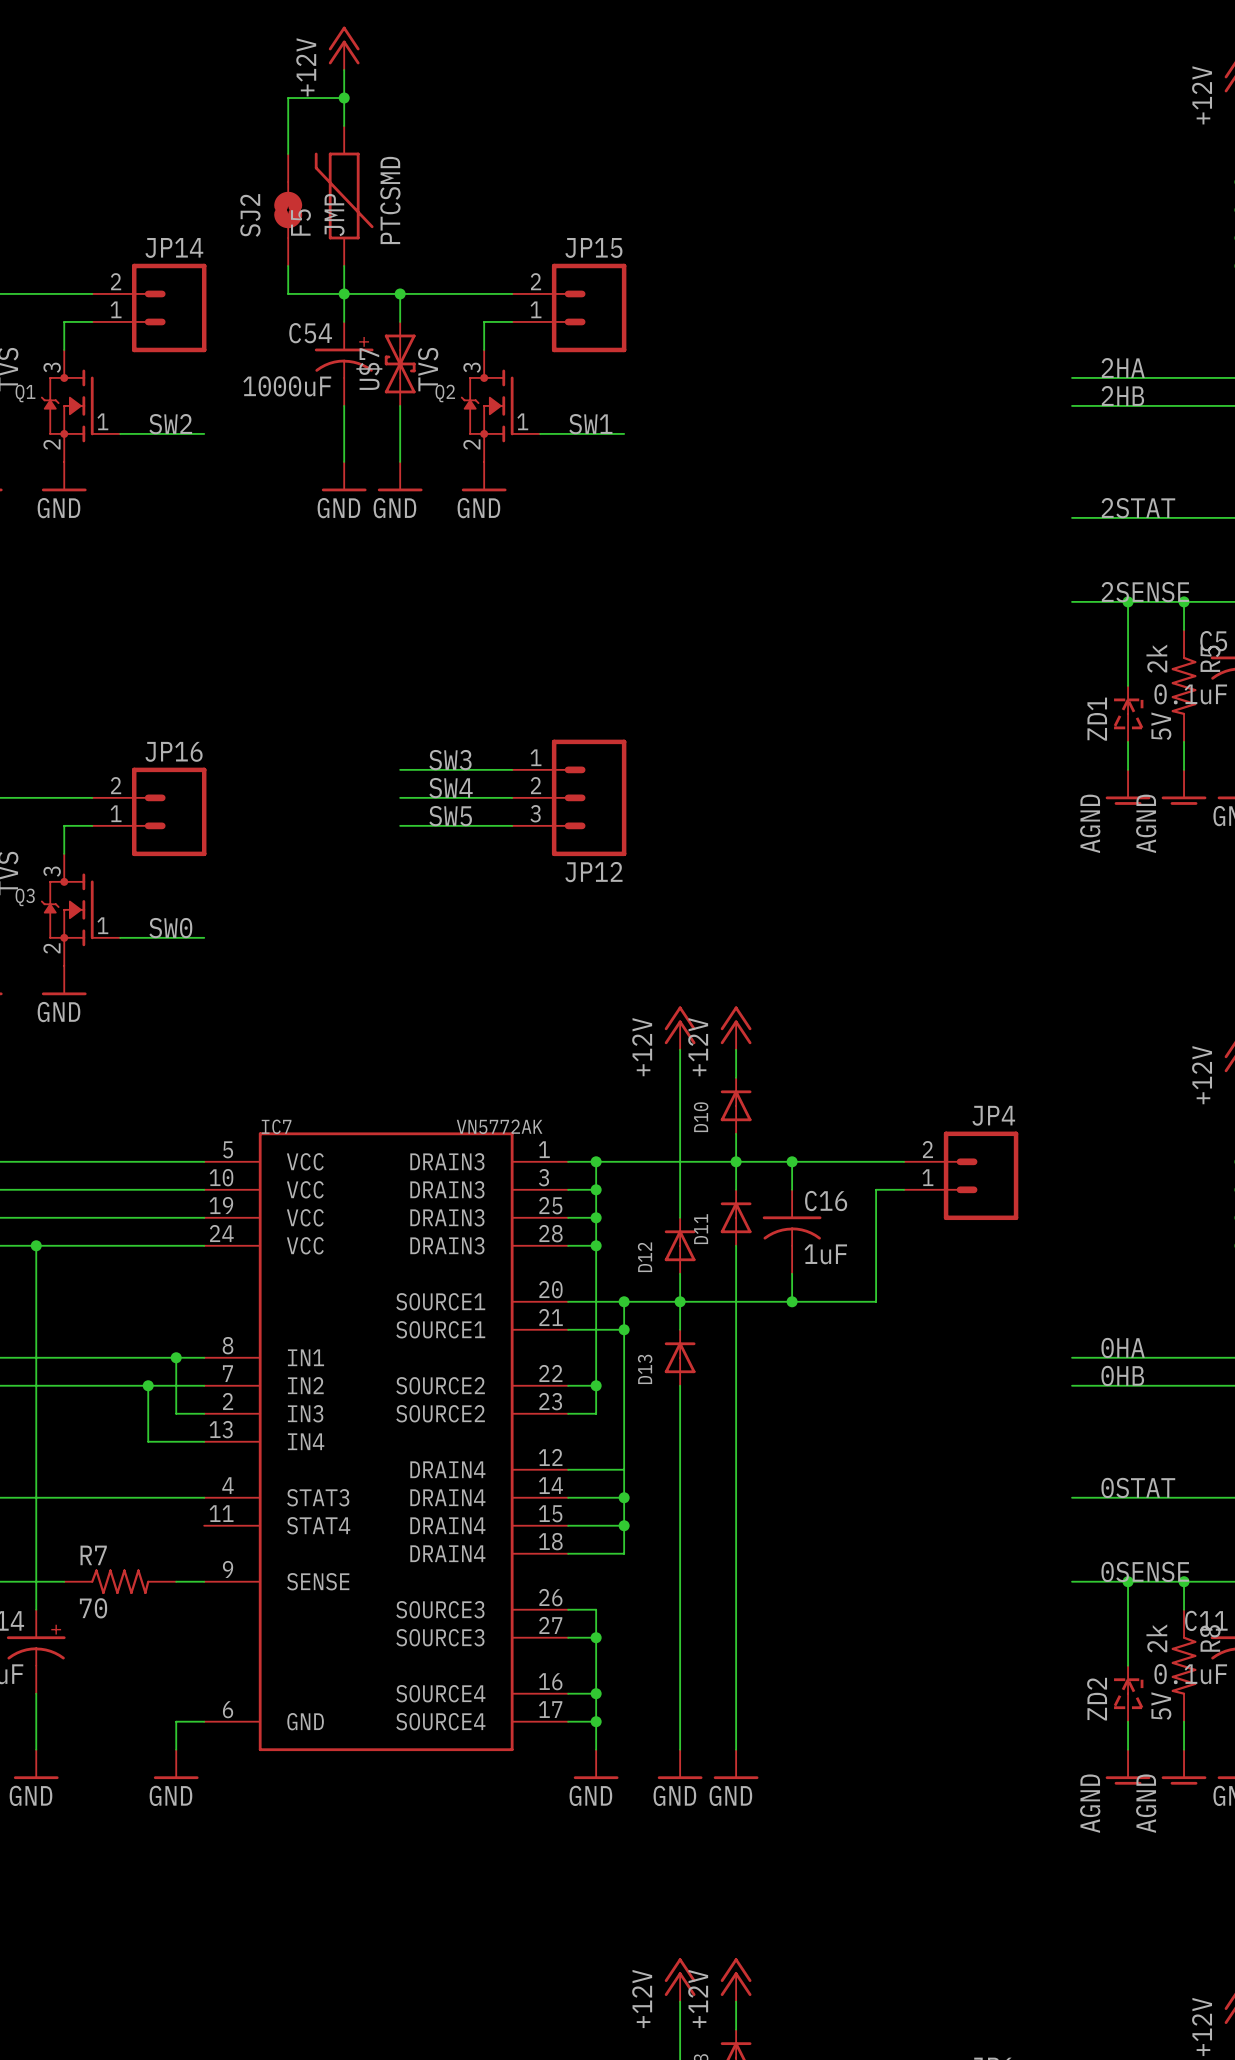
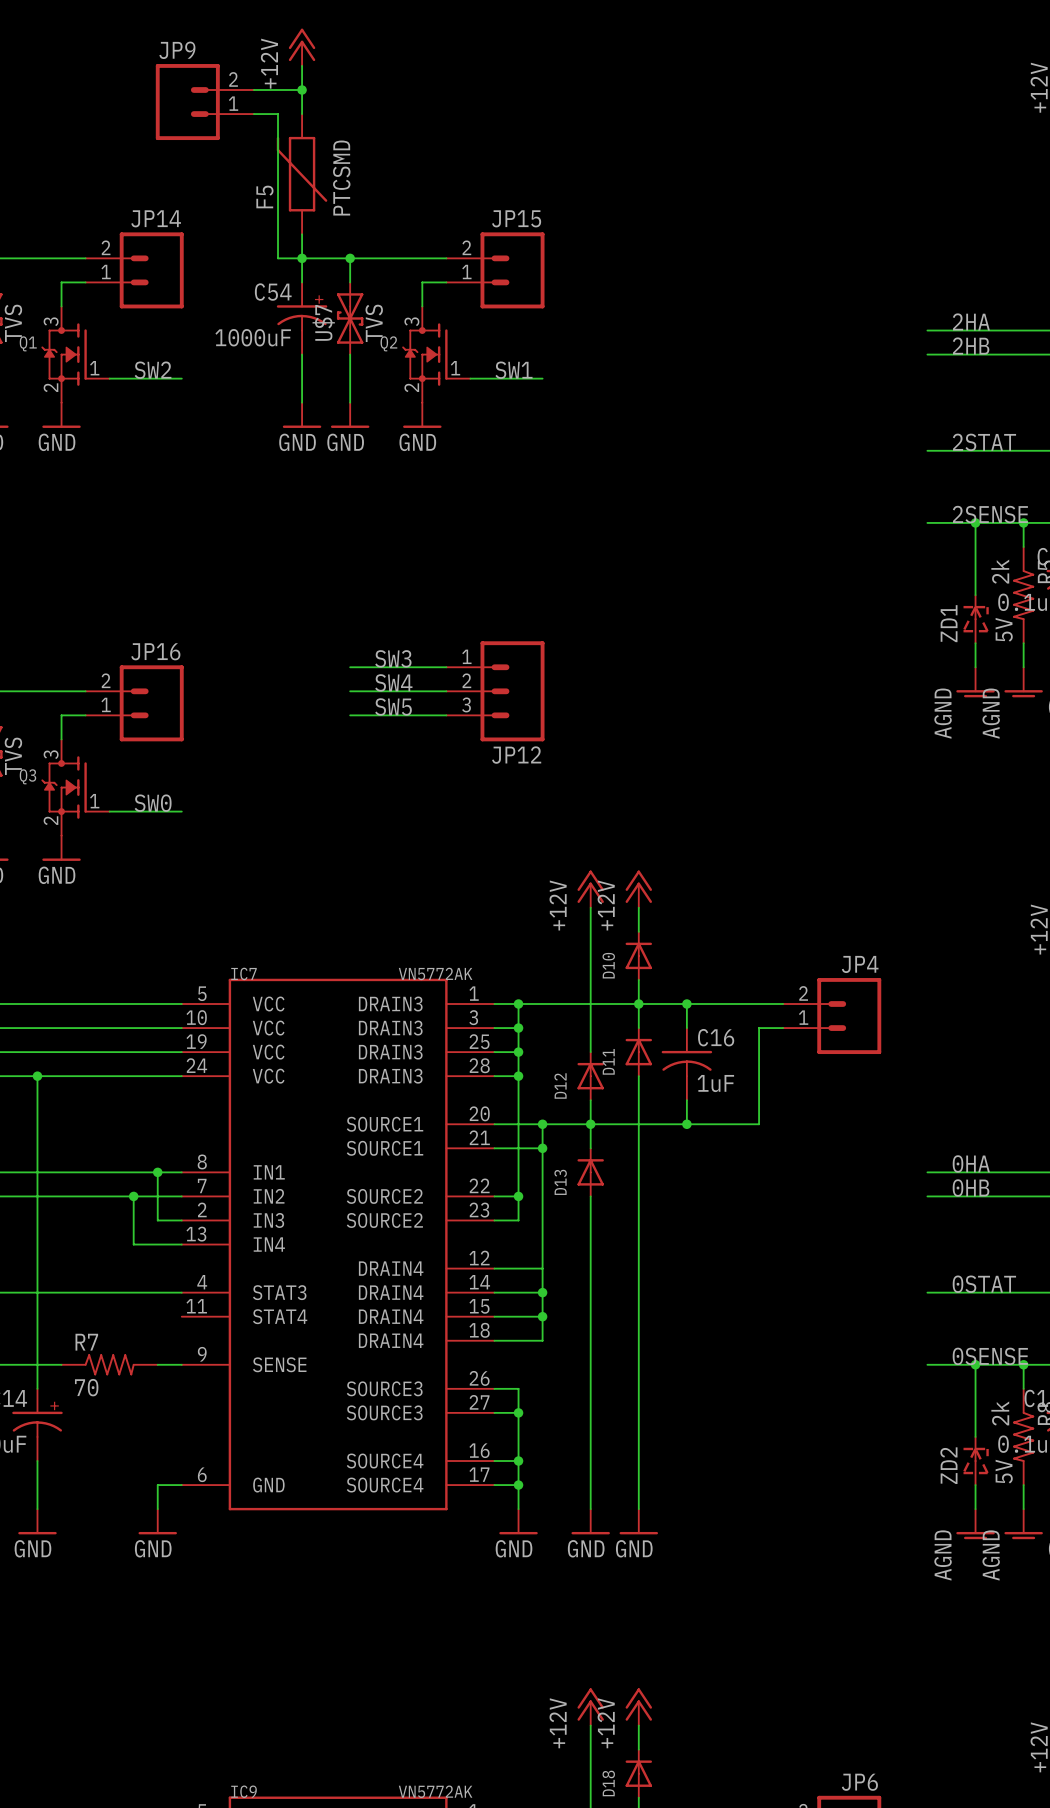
wire: (288, 98) (288, 154) -> none
JP9: none -> (204, 102)
SJ2: JMP (288, 209) -> none
wire: (288, 265) (288, 293) (316, 293) -> (253, 114) (278, 114) (278, 258)

